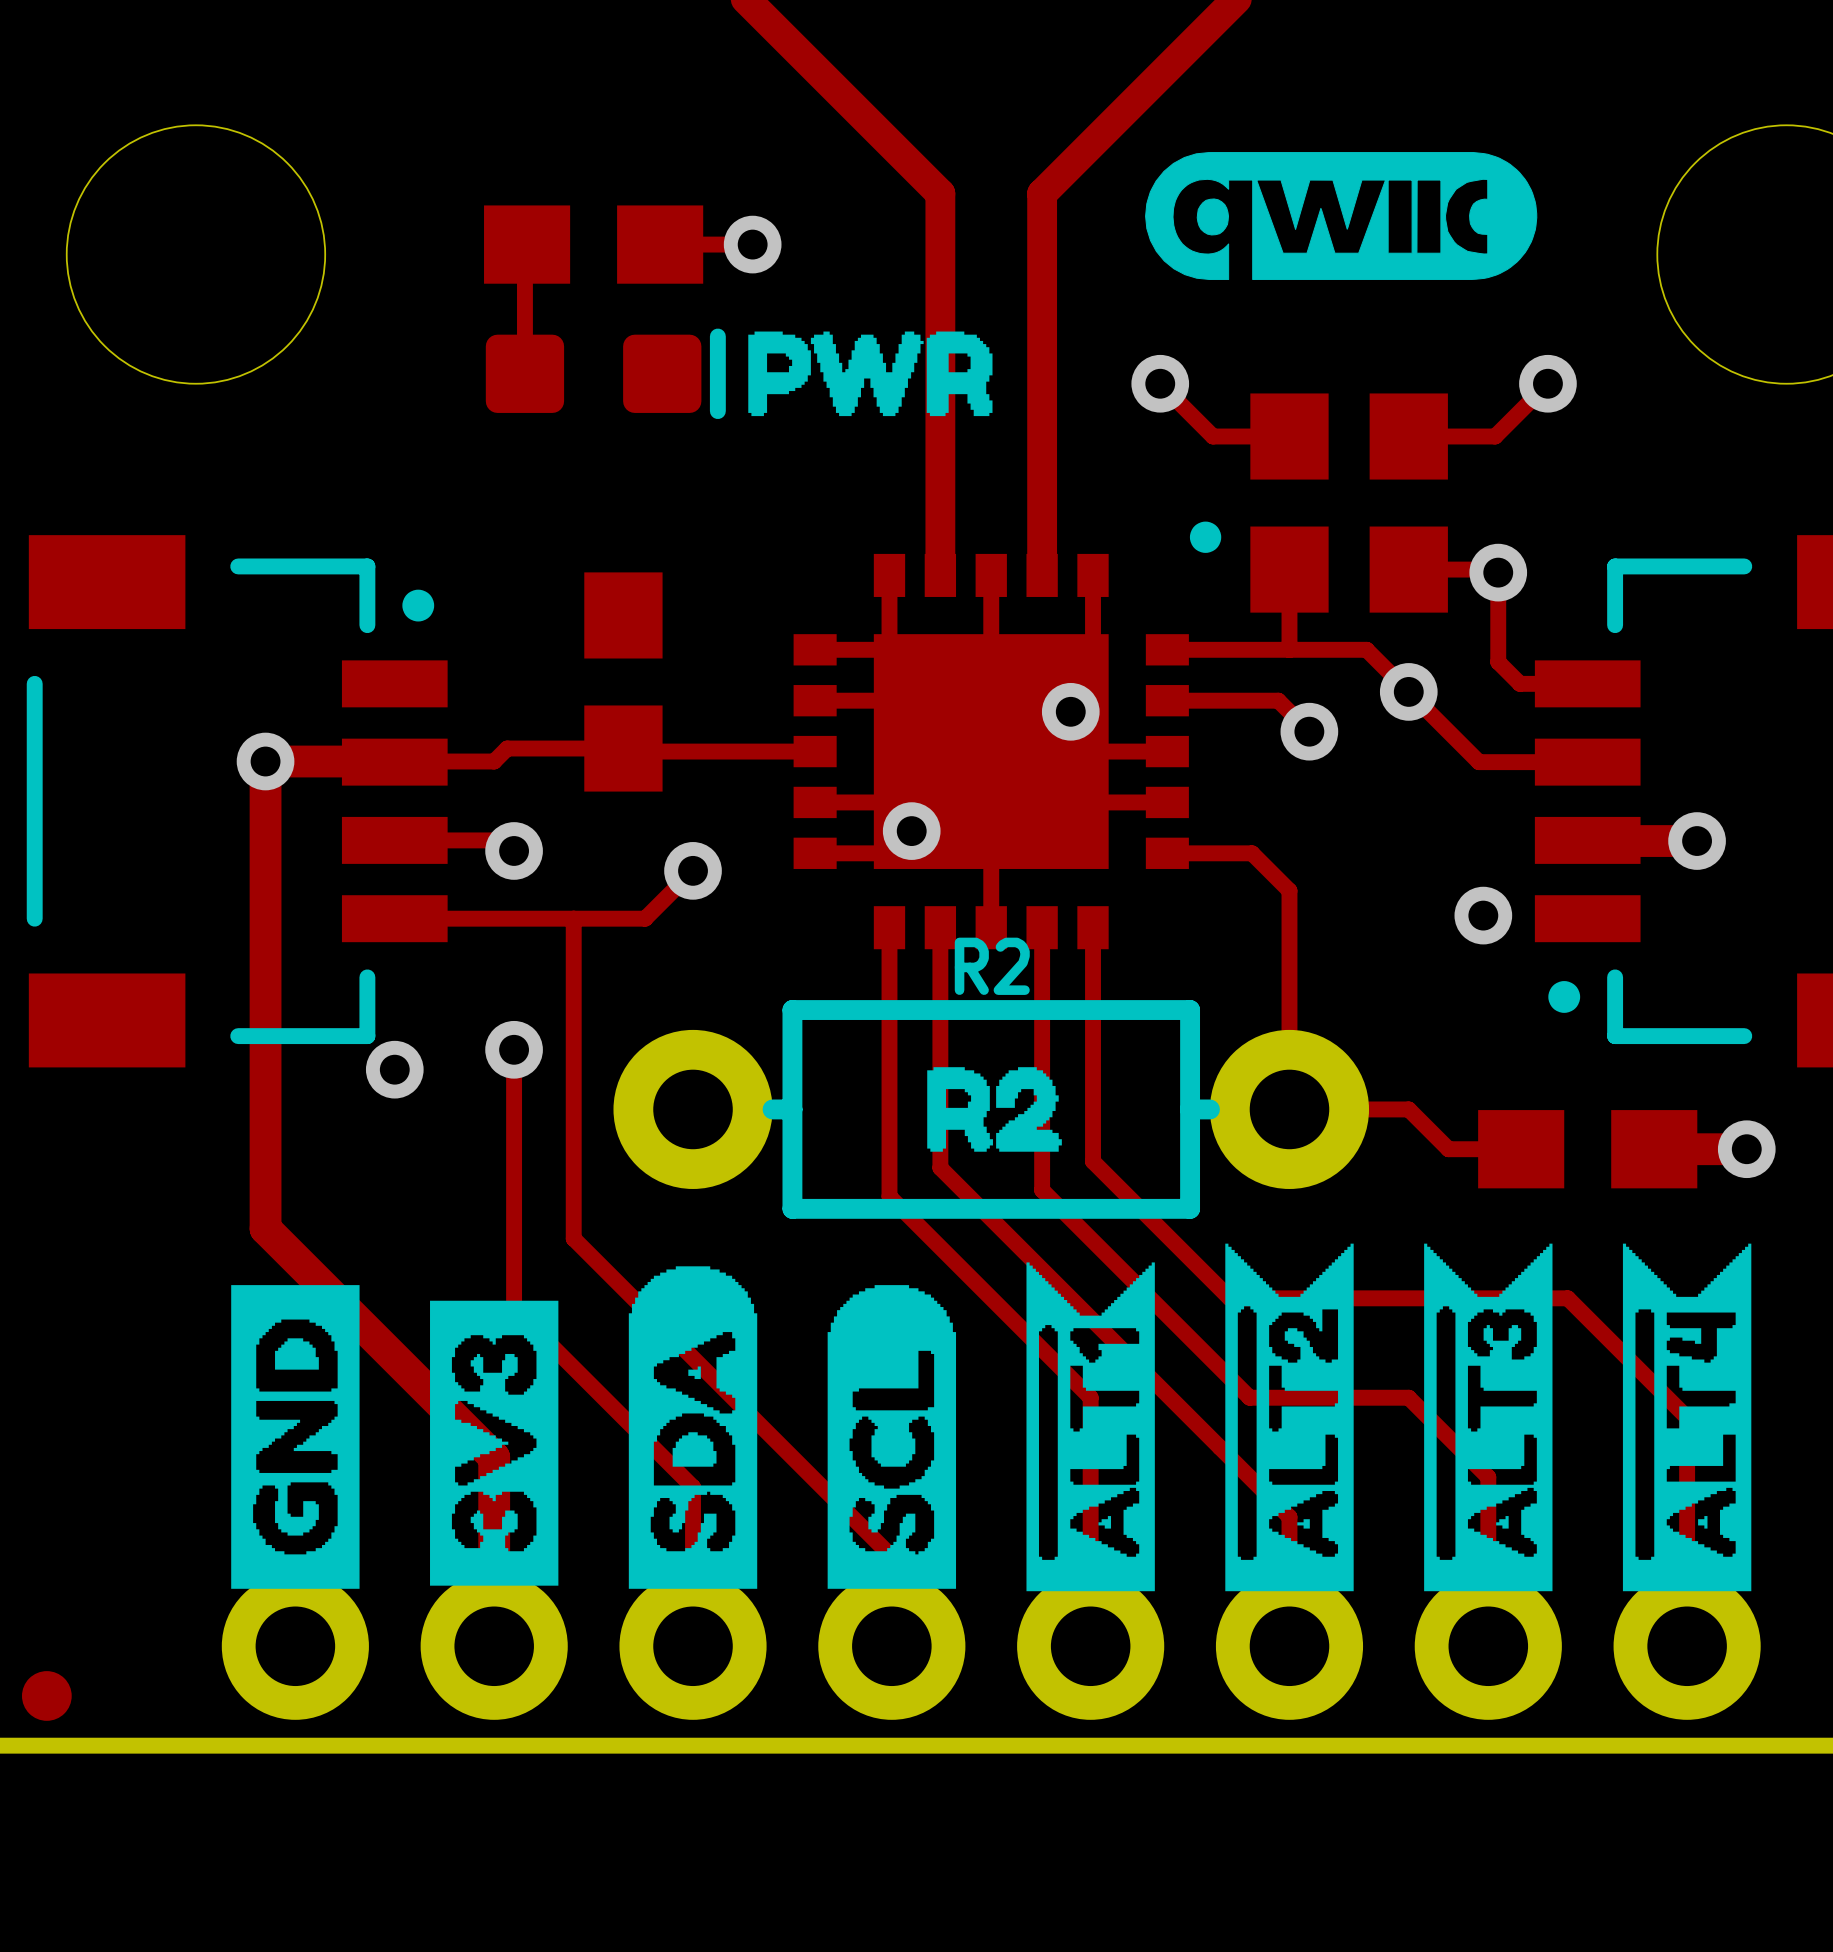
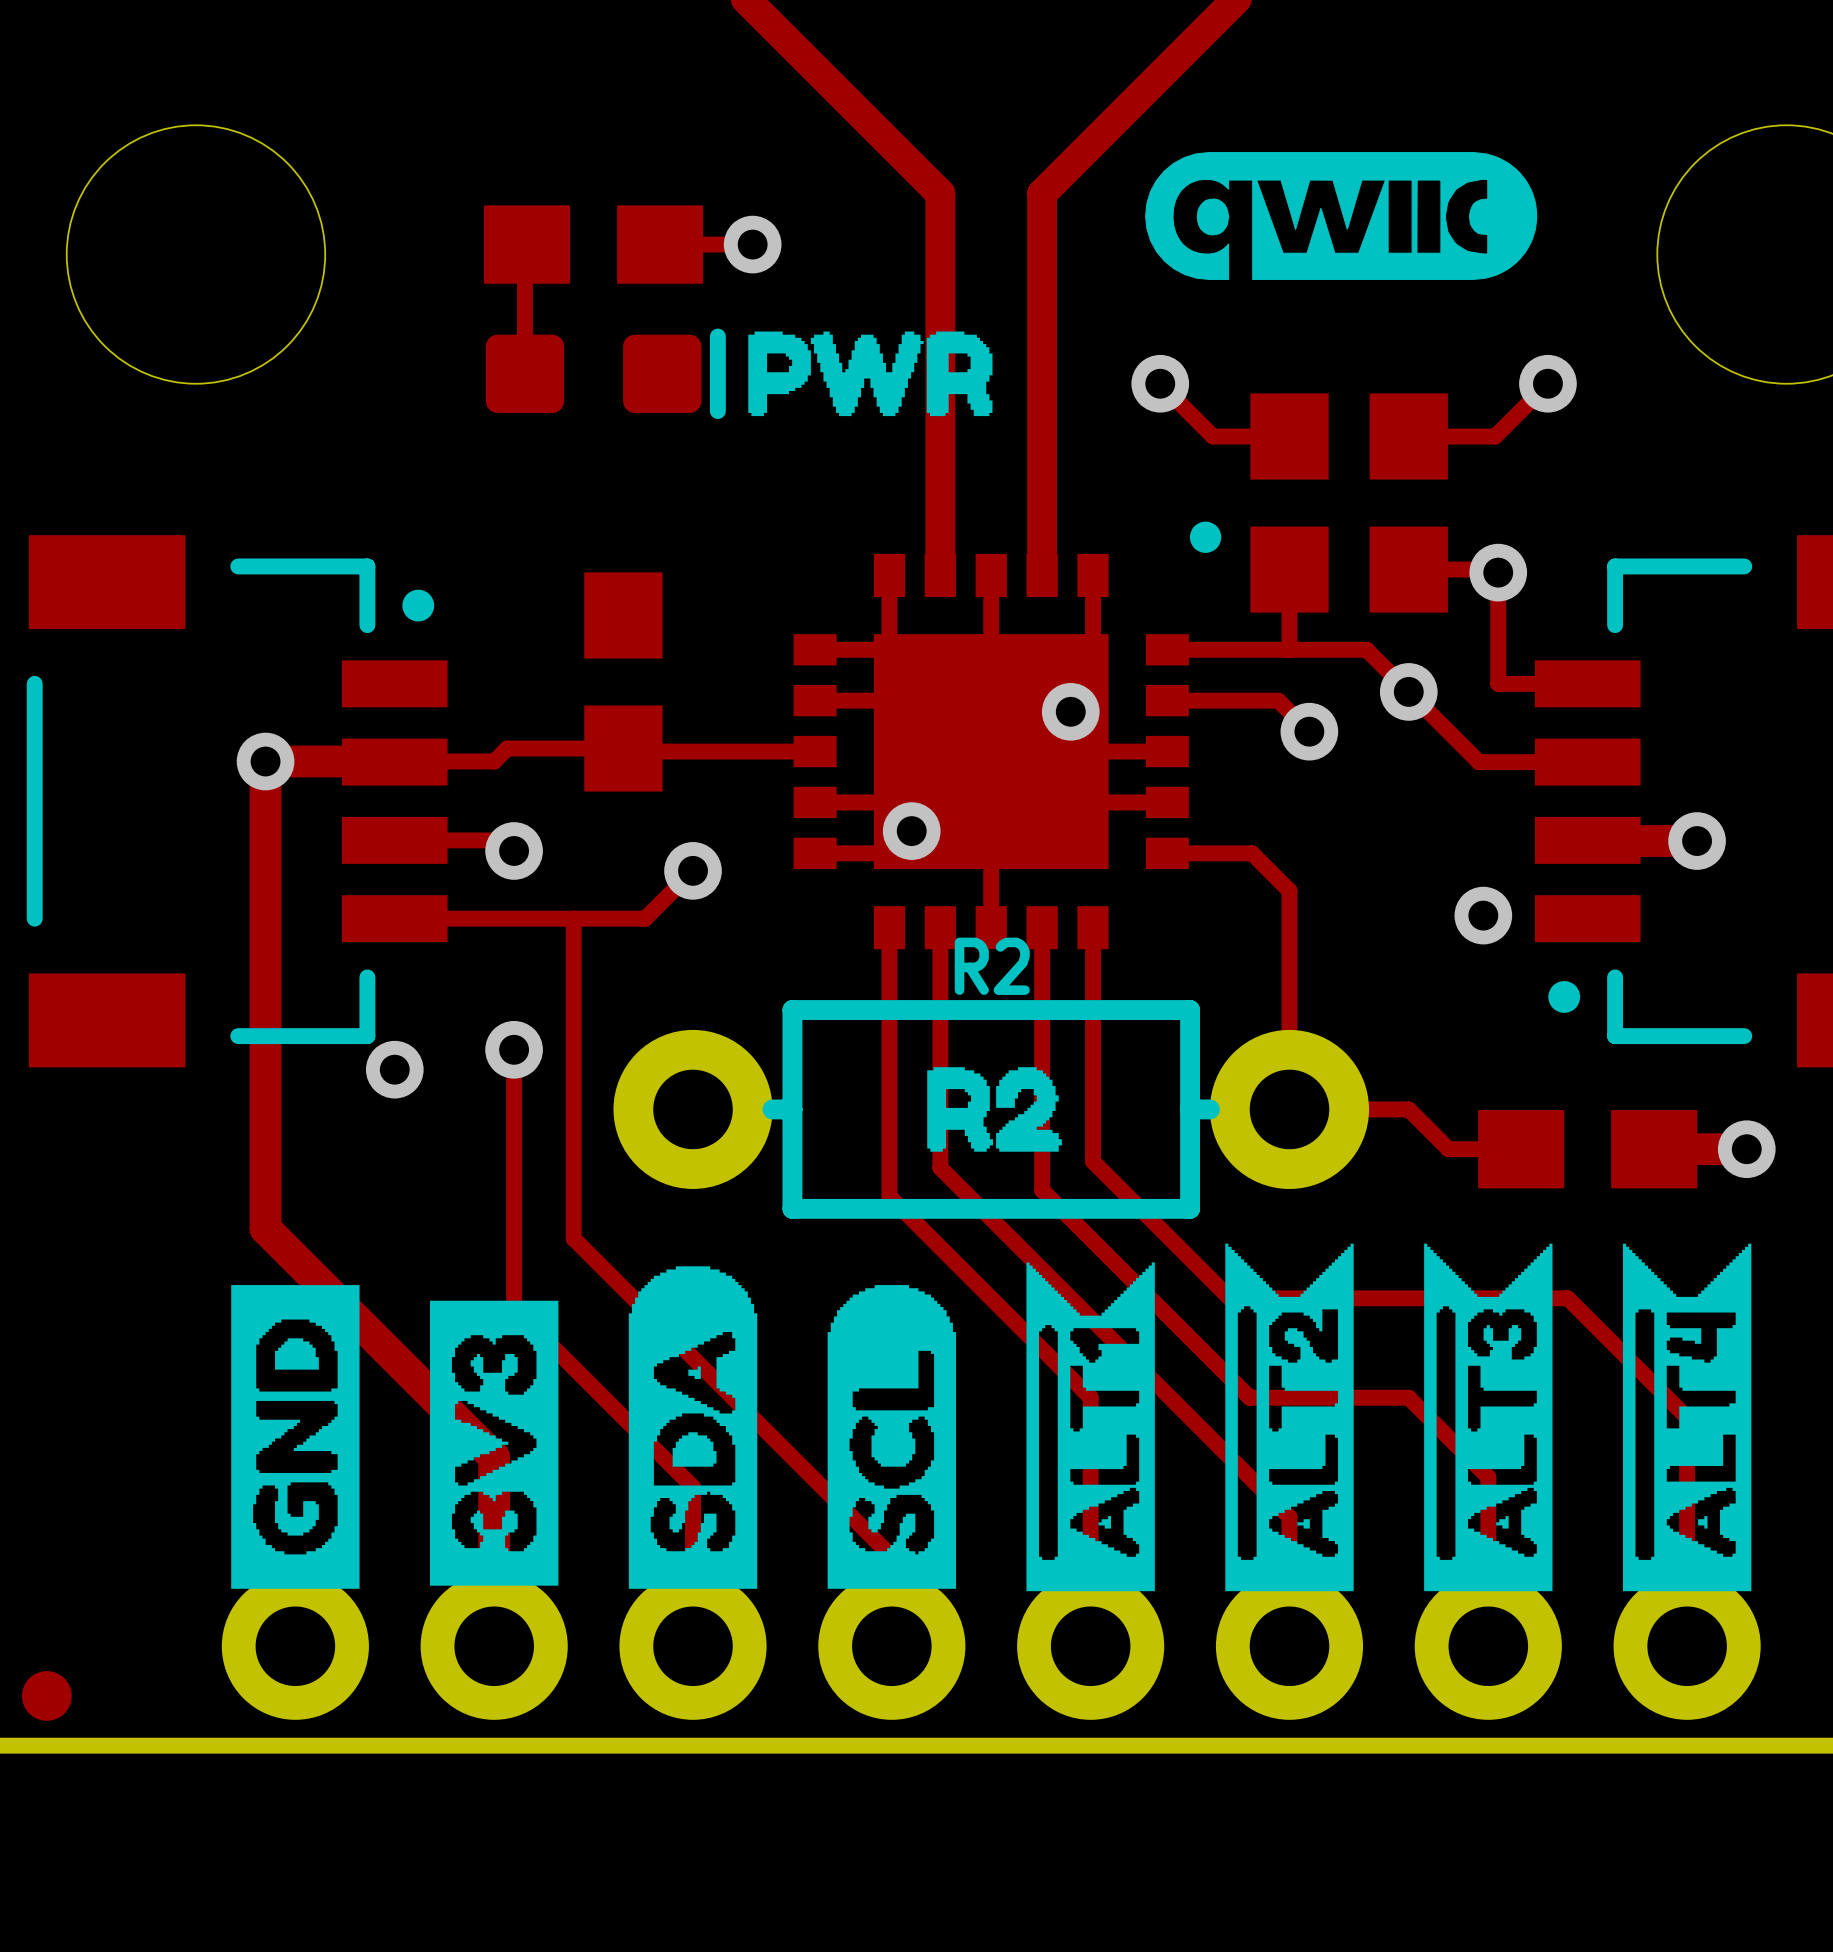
track: (1498, 662) (1520, 683) -> (1498, 662) (1498, 683) (1520, 683)

